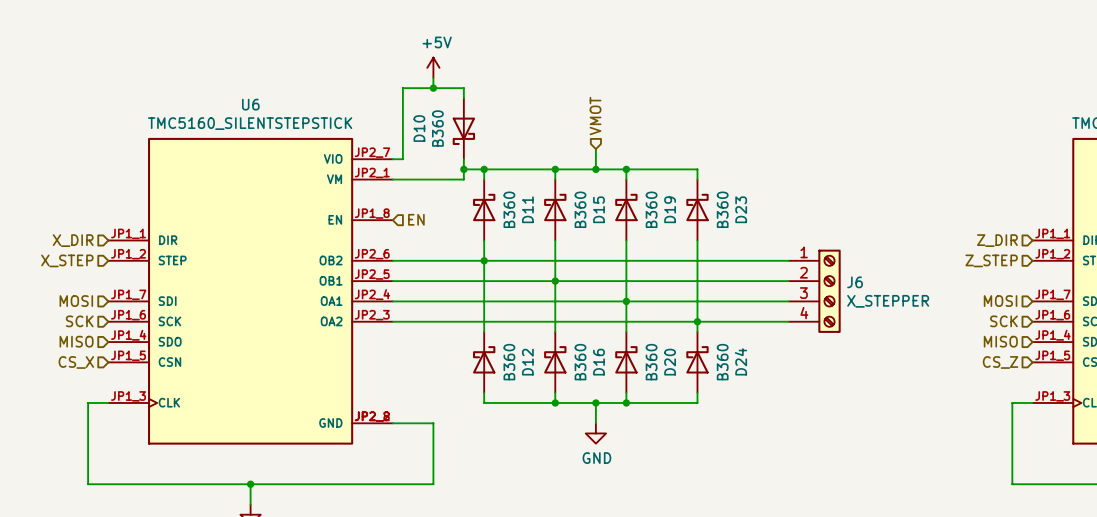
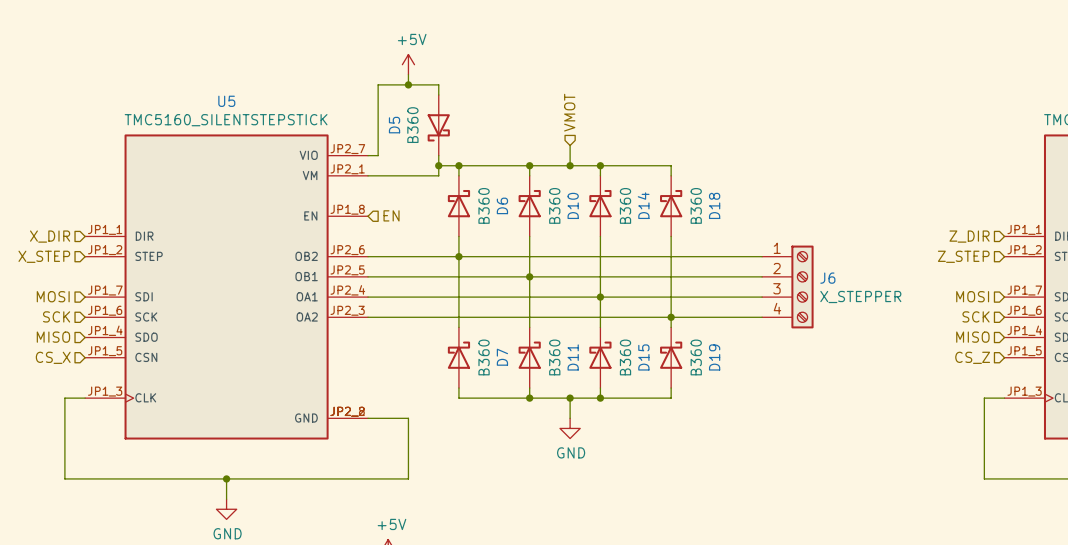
U6 name: U6 (250, 104) -> U5 (226, 101)
D10 name: D10 (419, 128) -> D5 (394, 125)
D11 name: D11 (527, 209) -> D6 (502, 205)
D15 name: D15 (598, 209) -> D10 (573, 205)
D19 name: D19 (670, 209) -> D14 (643, 205)
D23 name: D23 (741, 209) -> D18 (714, 205)
D24 name: D24 (740, 361) -> D19 (714, 357)
D12 name: D12 (527, 362) -> D7 (502, 357)
D16 name: D16 (598, 362) -> D11 (573, 357)
D20 name: D20 (670, 362) -> D15 (643, 357)

